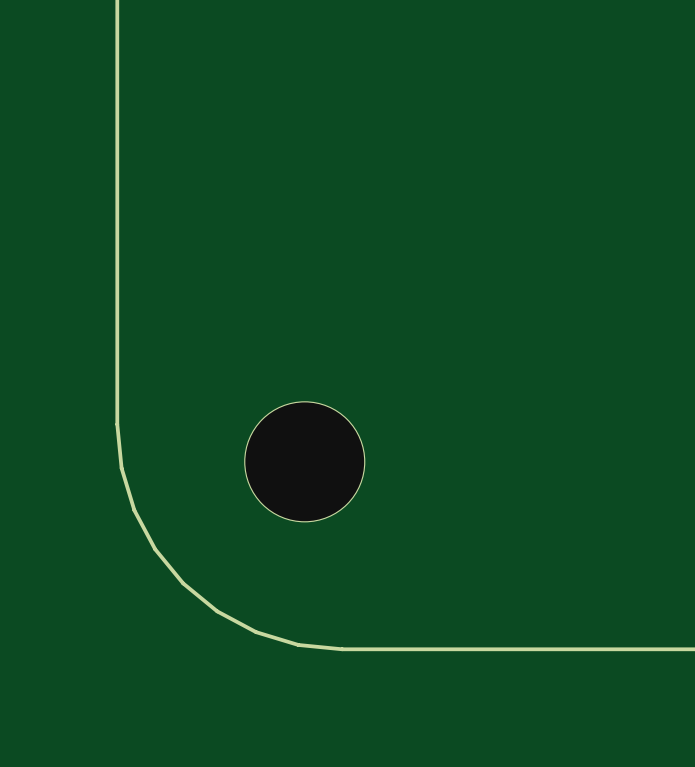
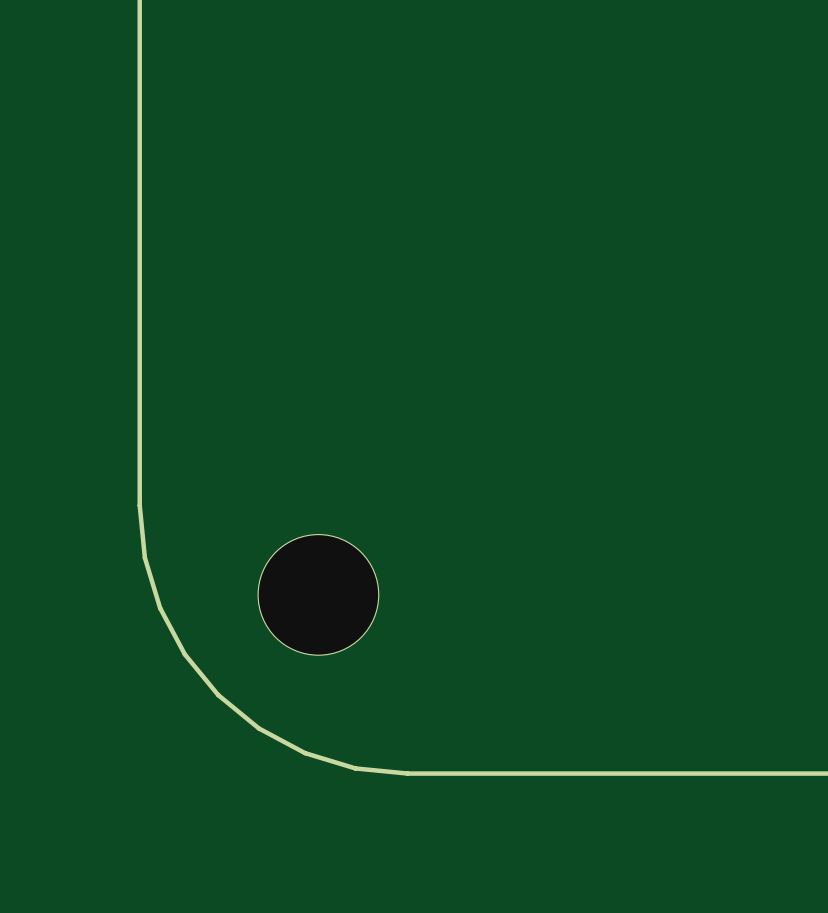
part: (304, 461) -> none
part: none -> (318, 594)

